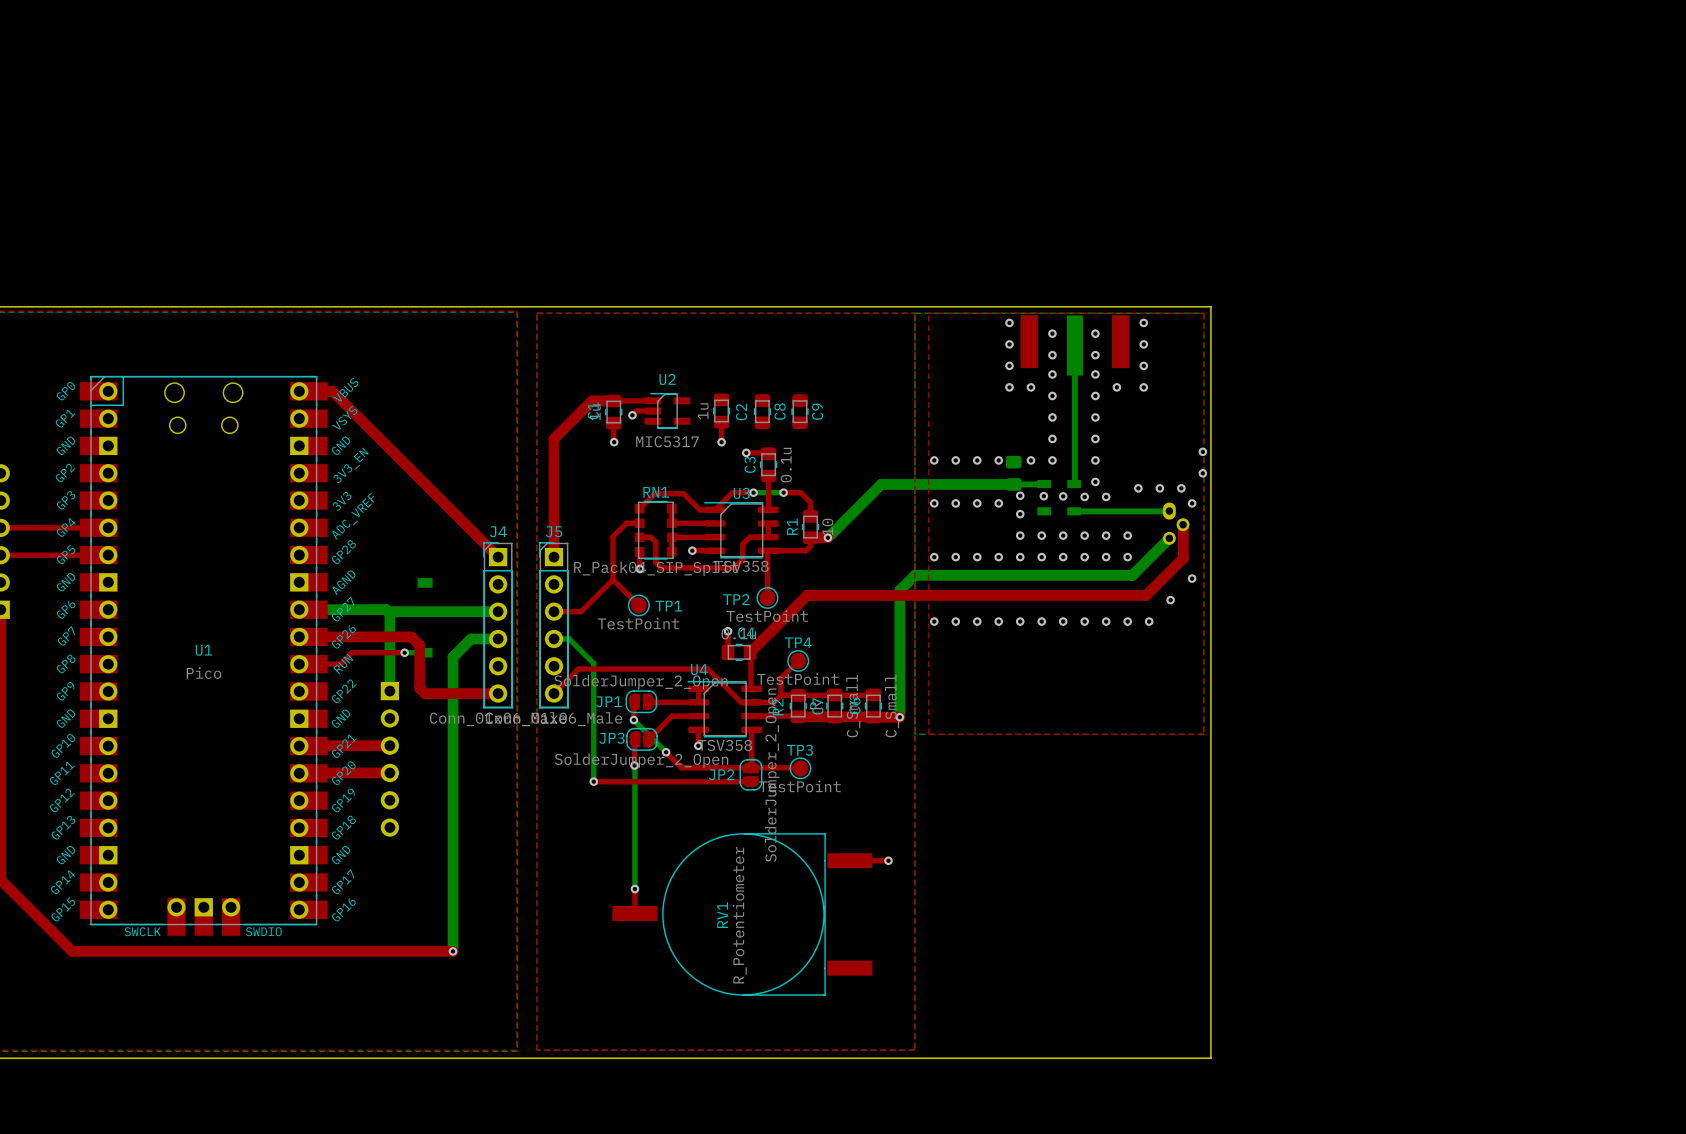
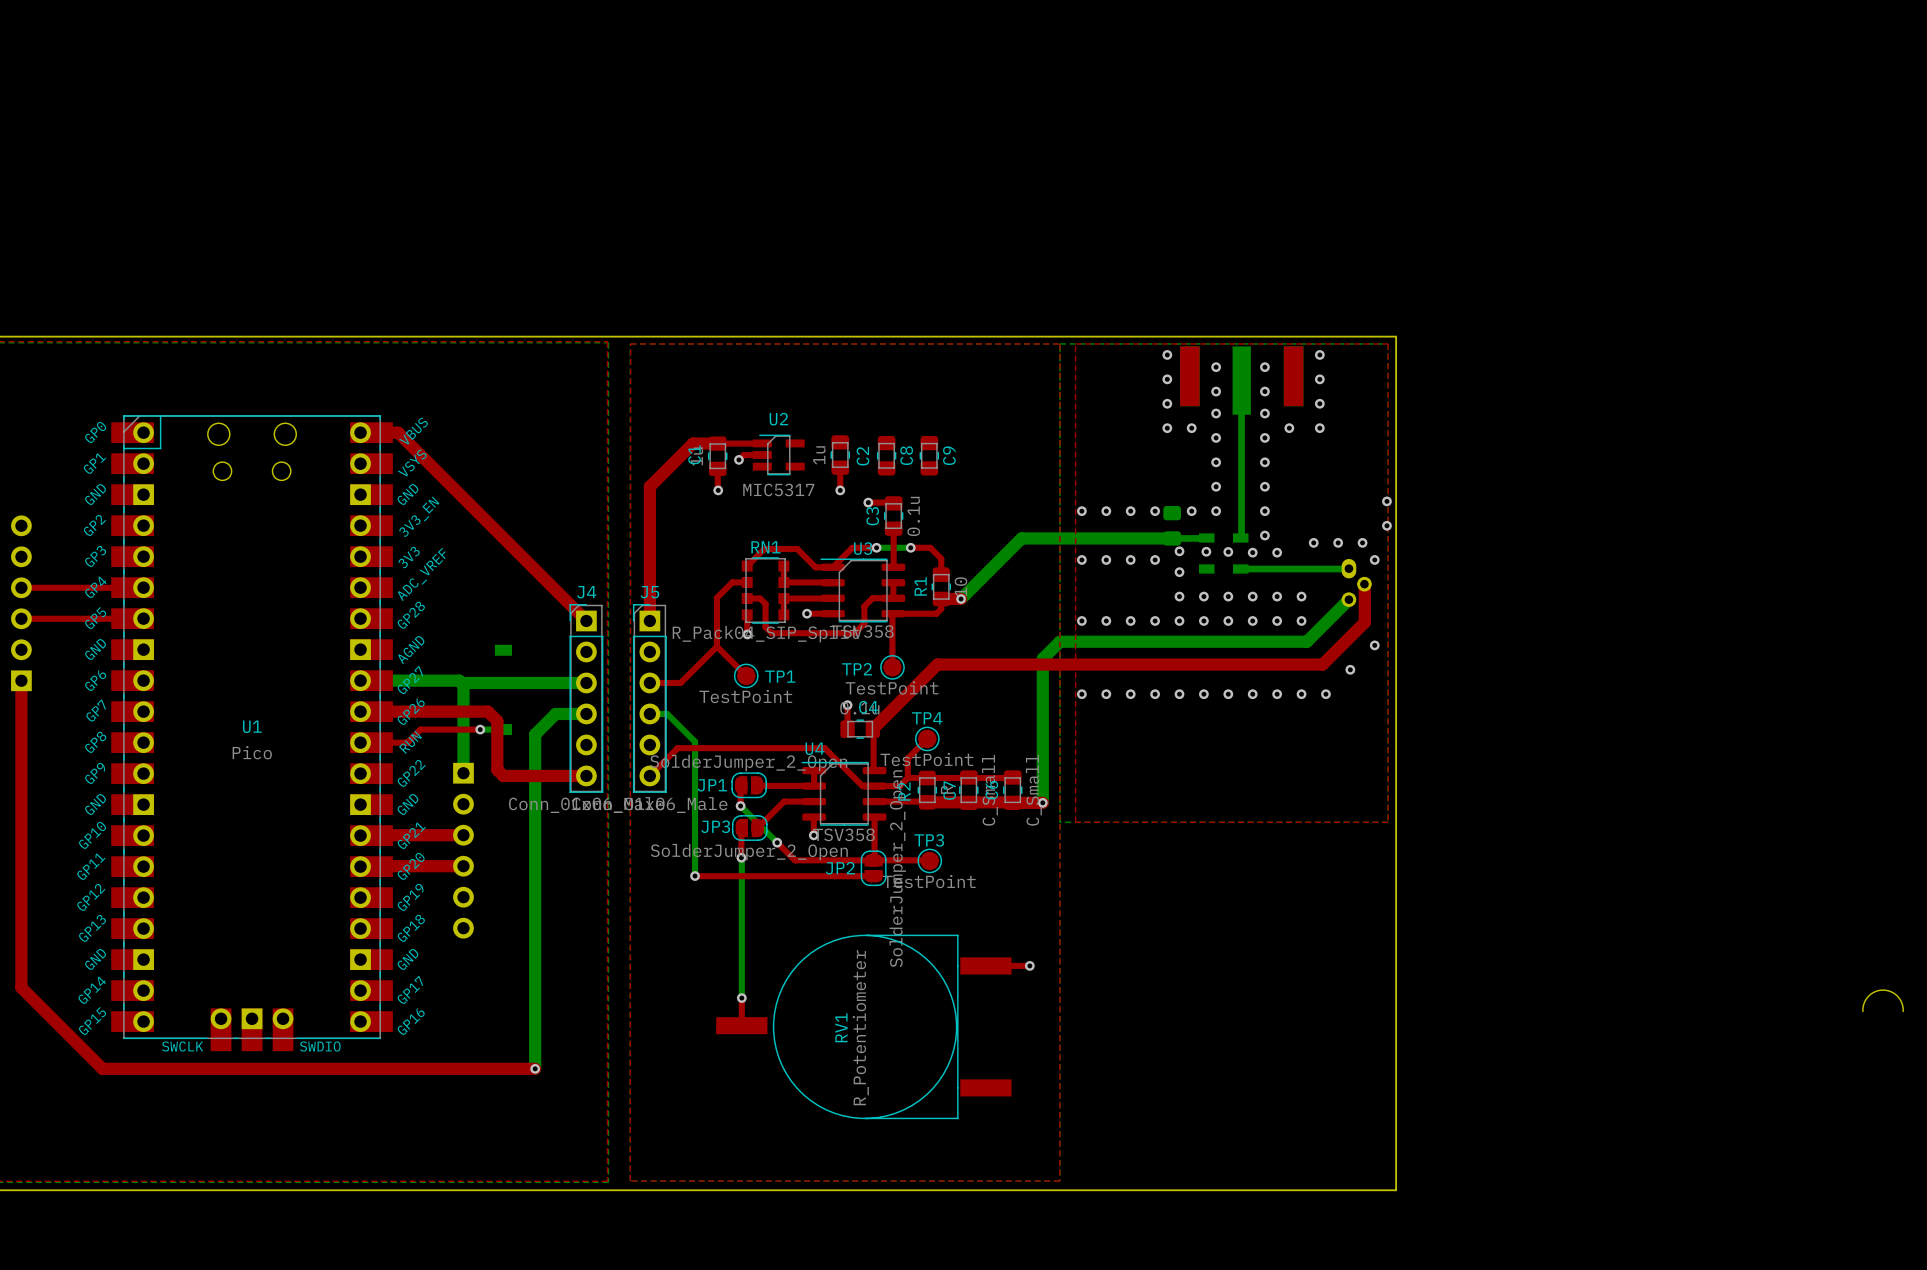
board edge: none -> (1862, 1011) (1867, 997) (1873, 992) (1883, 990) (1892, 992) (1898, 997) (1903, 1011)

